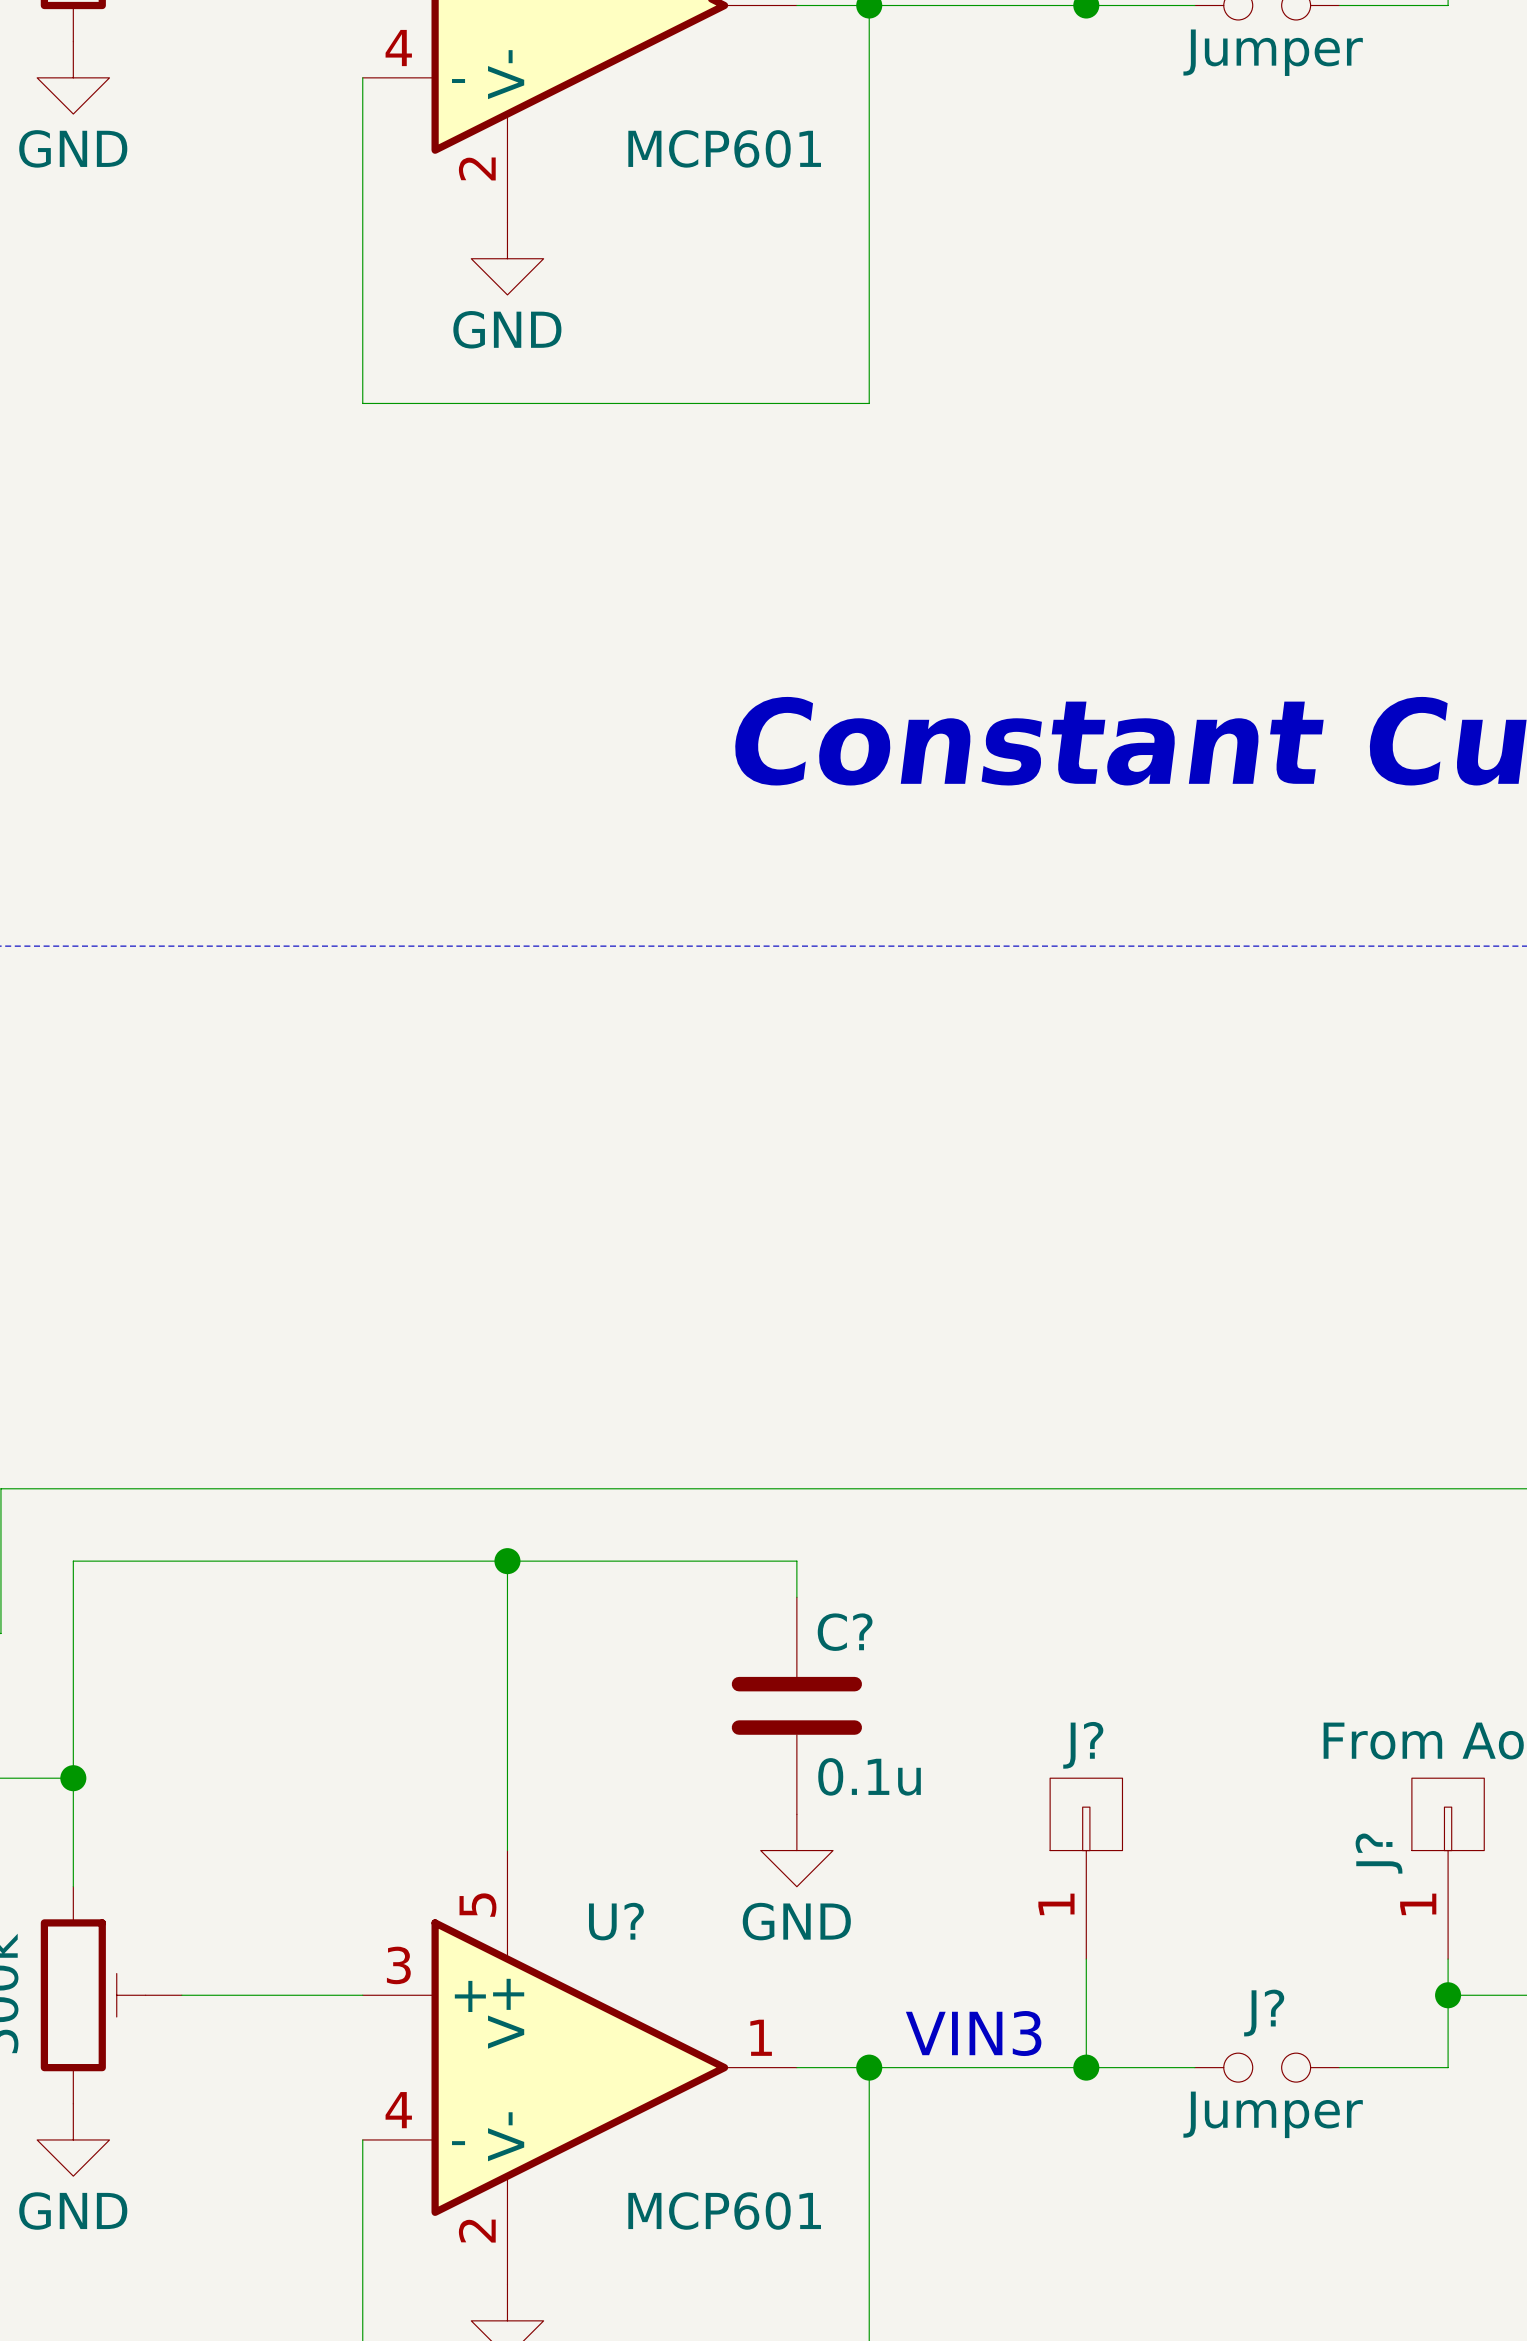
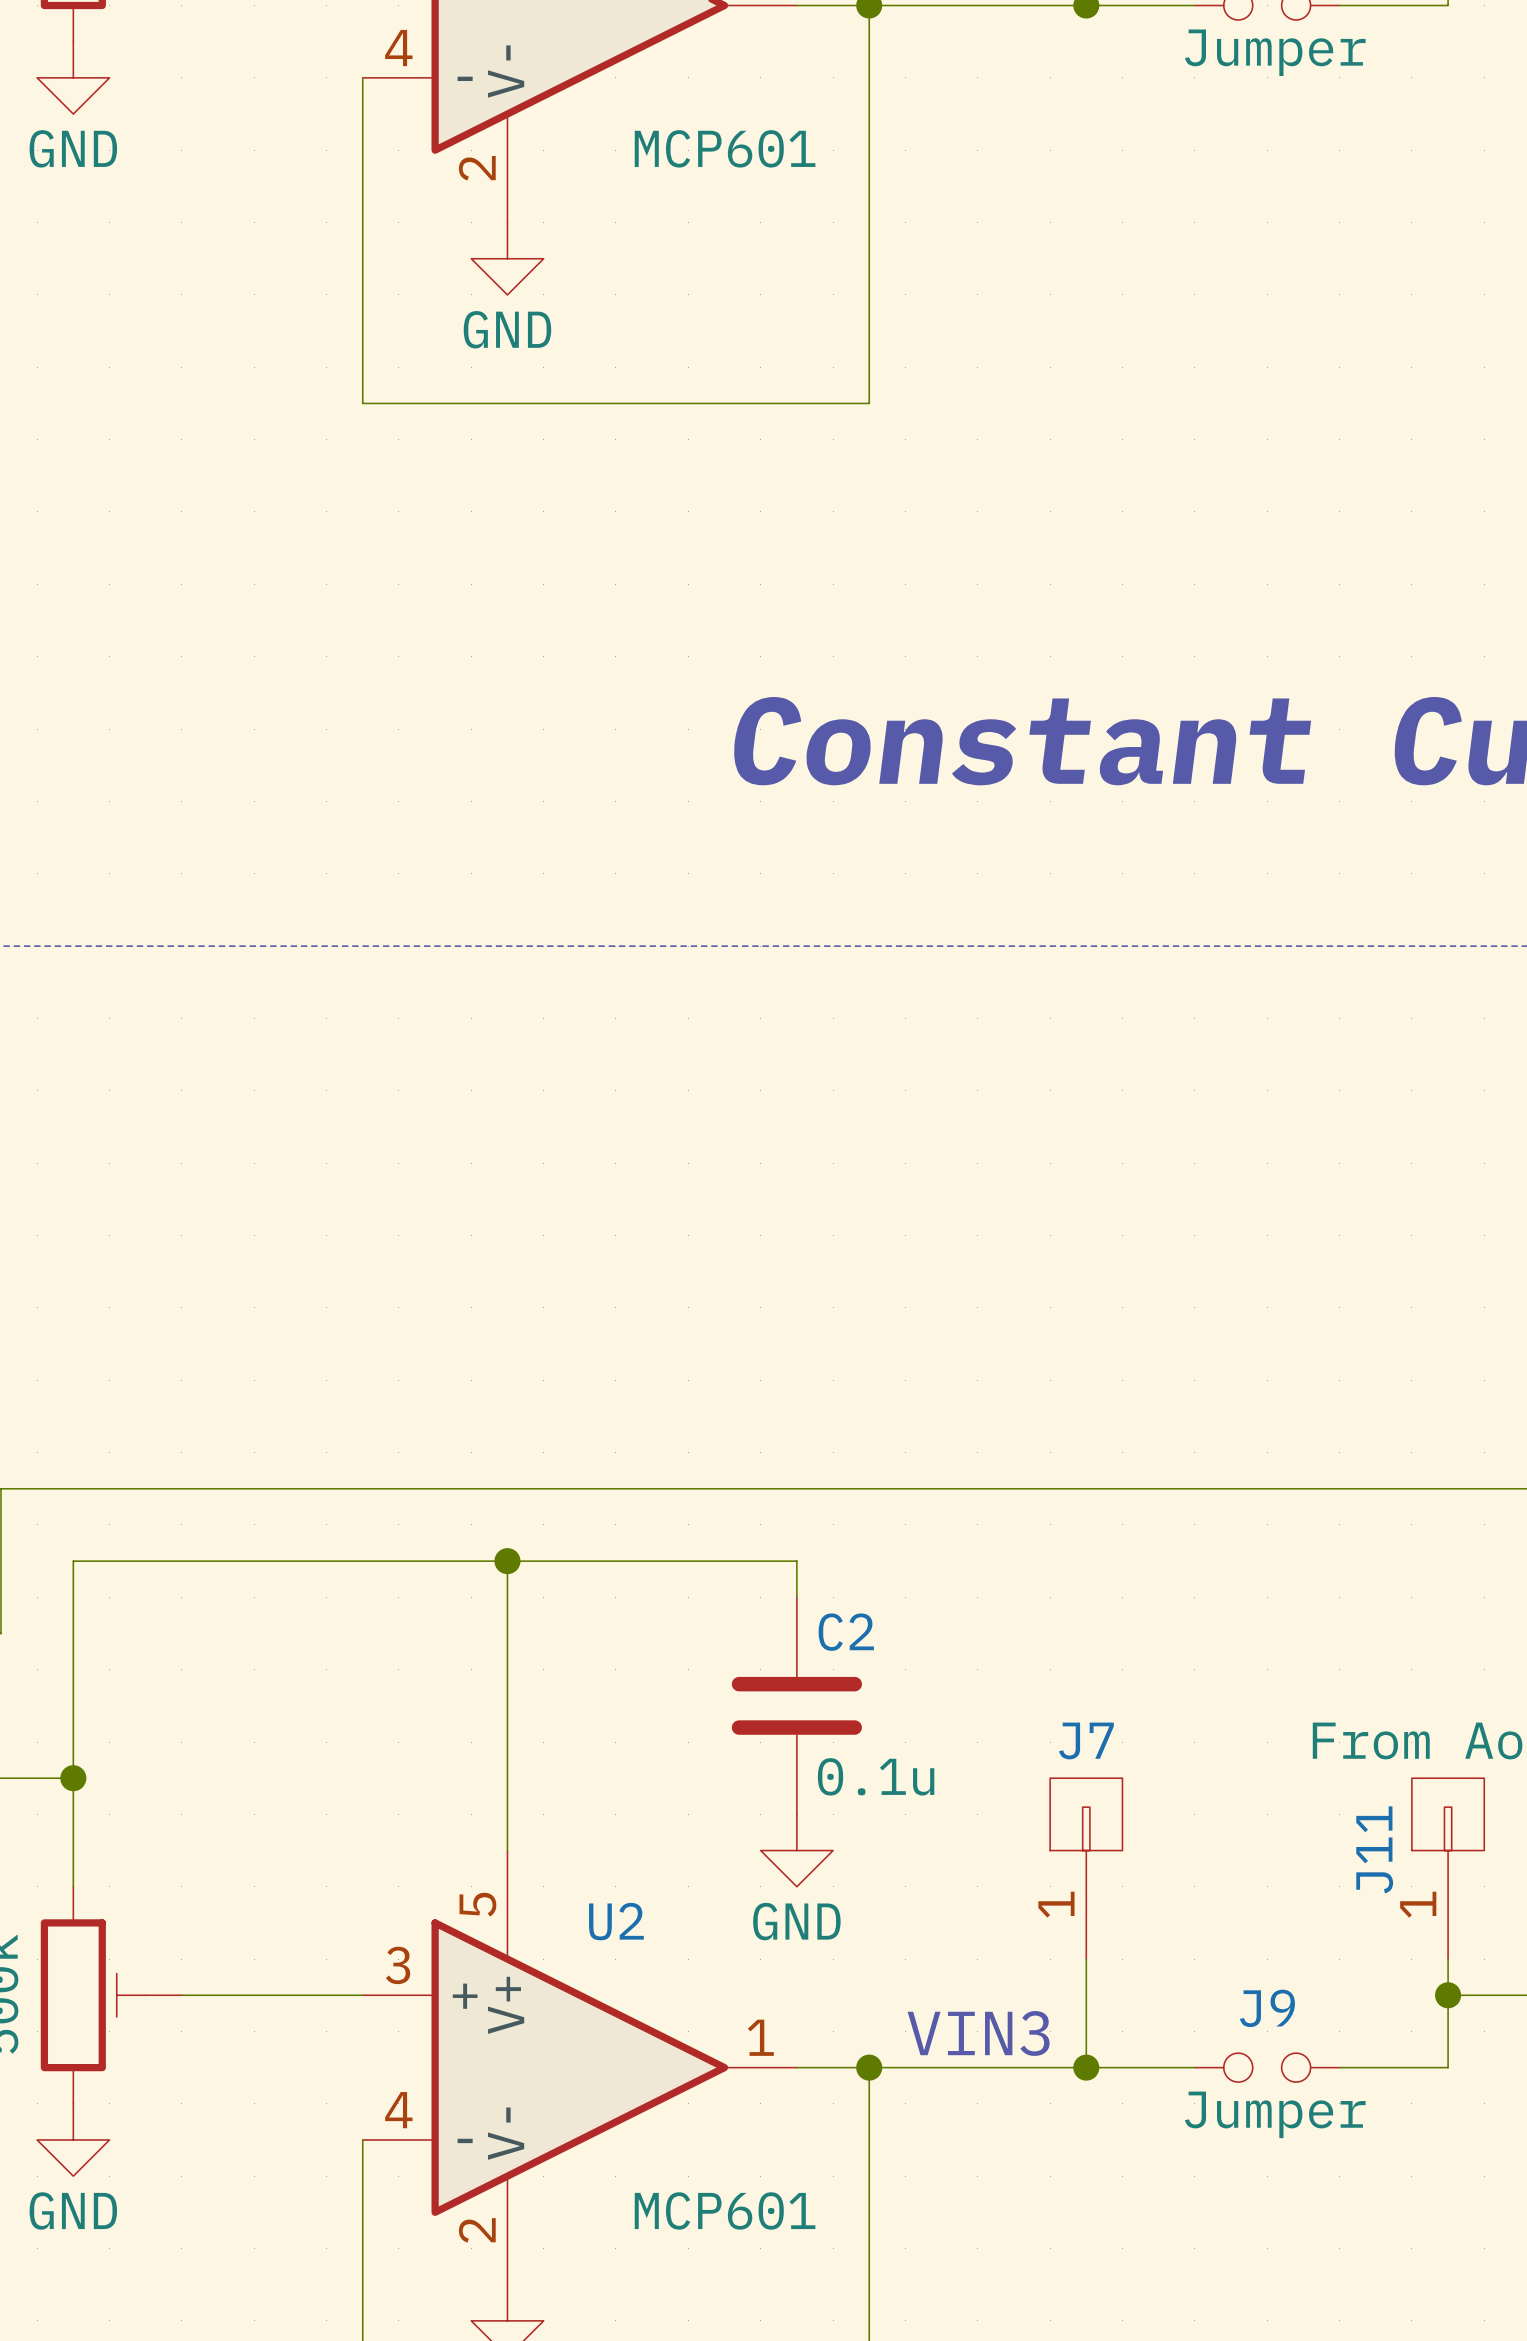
C? name: C? (845, 1632) -> C2 (846, 1632)
J? name: J? (1083, 1745) -> J7 (1086, 1740)
J? name: J? (1379, 1853) -> J11 (1374, 1849)
U? name: U? (616, 1921) -> U2 (616, 1921)
J? name: J? (1264, 2013) -> J9 (1267, 2008)

